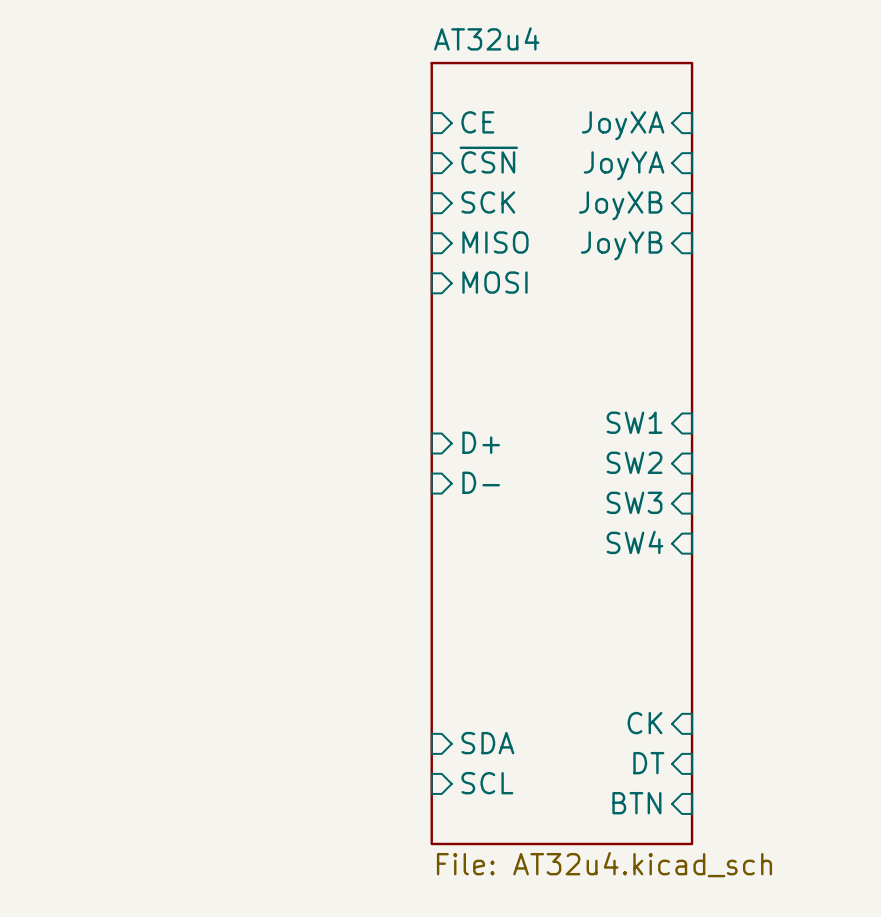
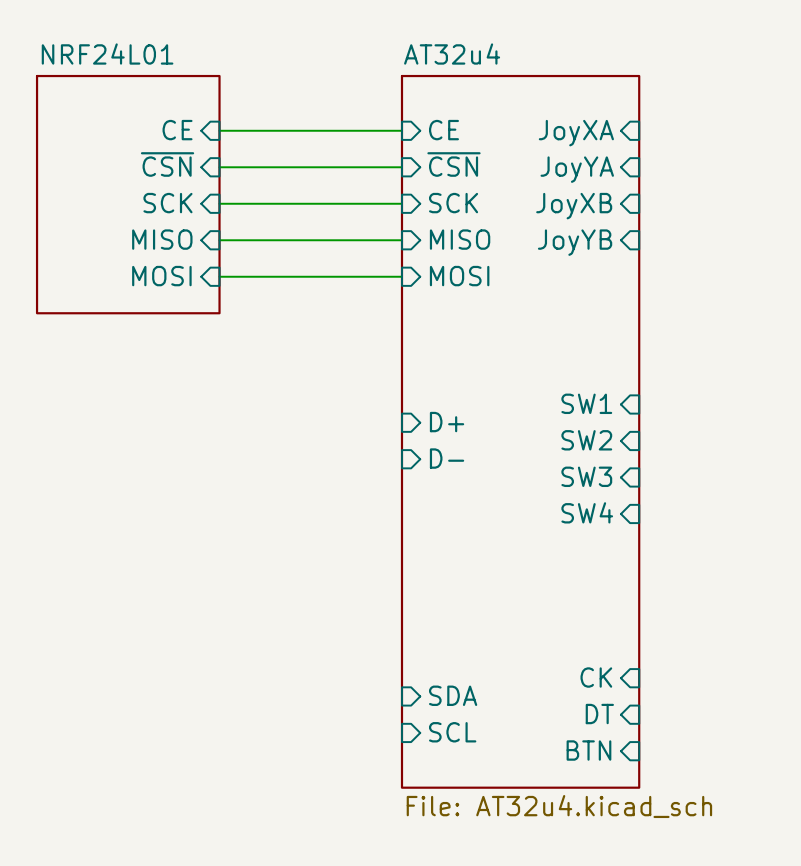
sheet pin: none -> CE (177, 130)
wire: none -> (219, 130) (402, 130)
sheet pin: none -> ~{CSN} (167, 164)
wire: none -> (219, 167) (402, 167)
sheet NRF24L01: none -> (128, 194)
sheet pin: none -> SCK (167, 203)
wire: none -> (219, 203) (402, 203)
sheet pin: none -> MISO (162, 239)
wire: none -> (219, 240) (402, 240)
sheet pin: none -> MOSI (161, 276)
wire: none -> (219, 276) (402, 276)

